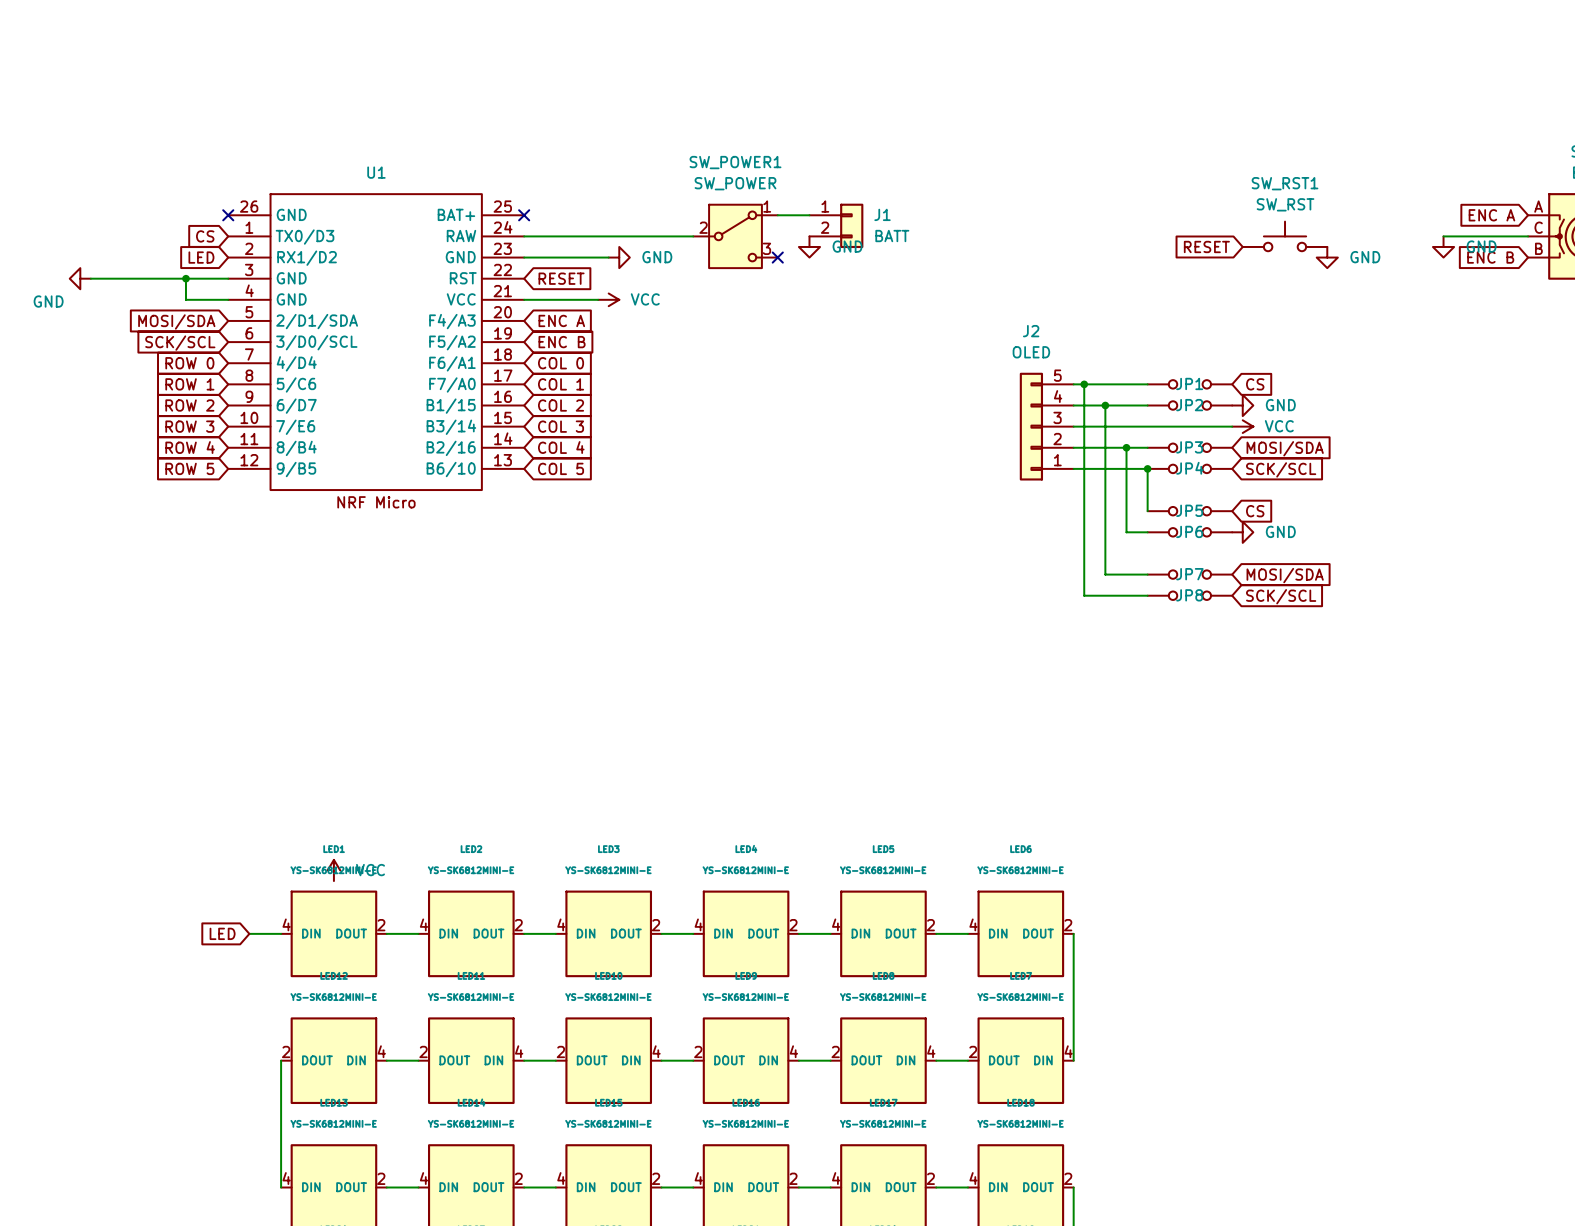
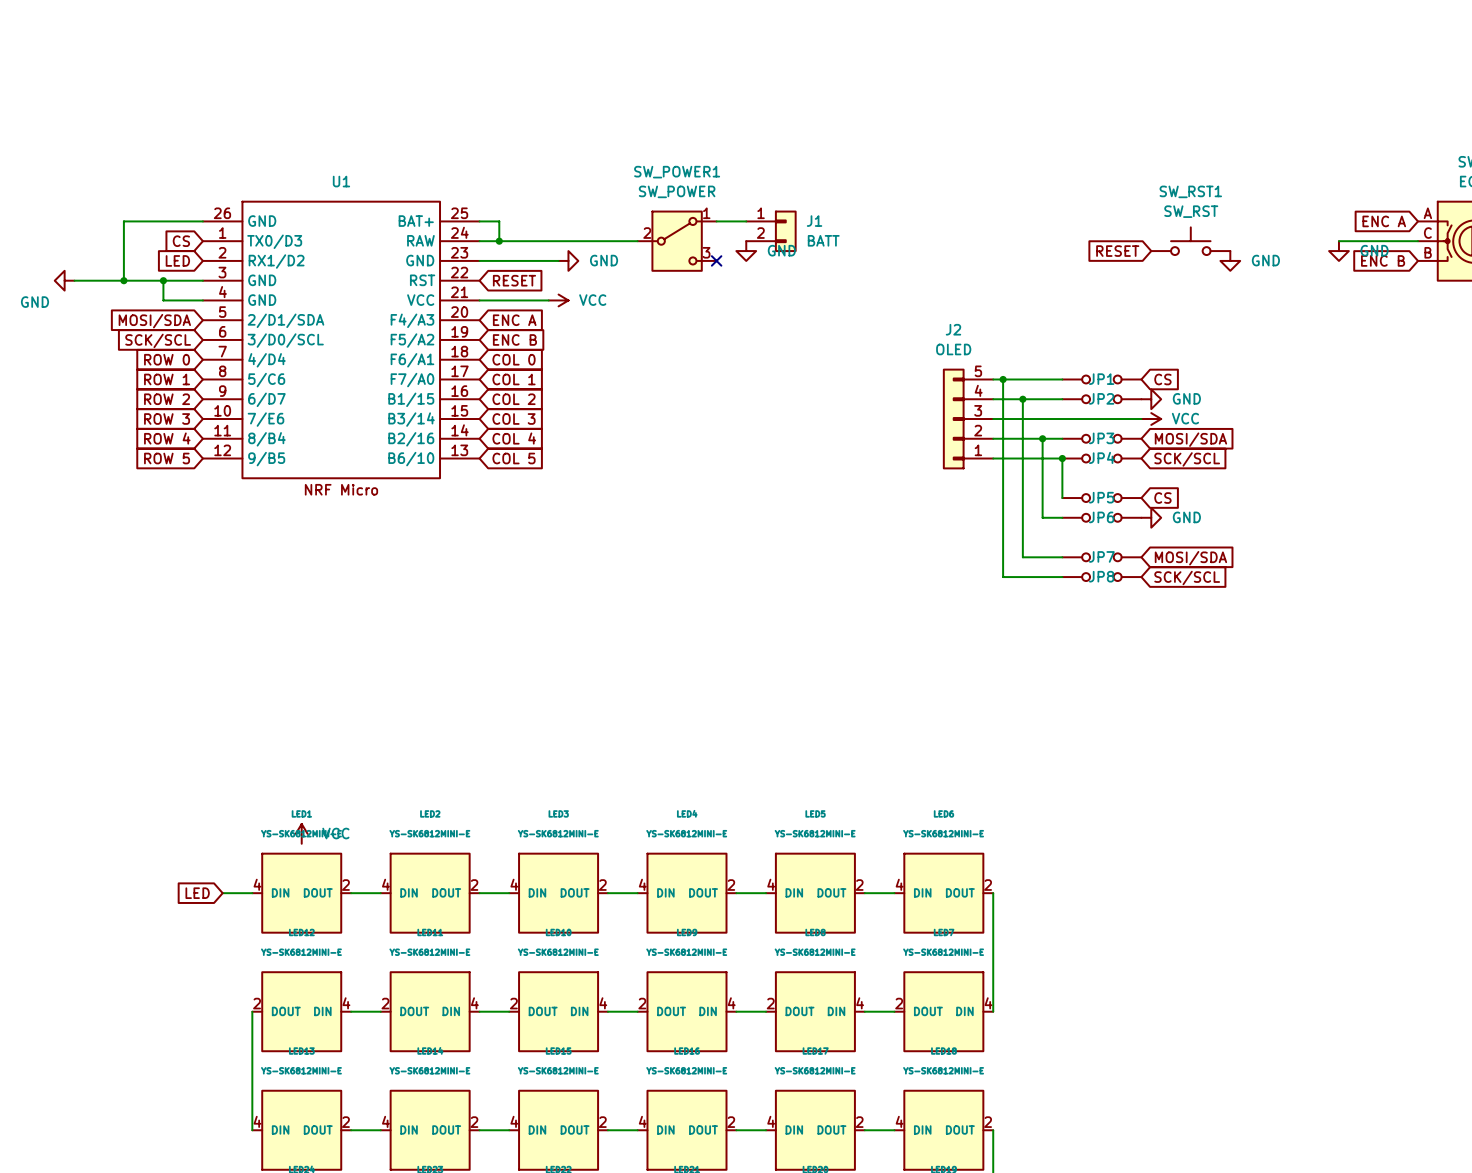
wire: none -> (202, 221) (123, 221) (123, 280)
no-connect mark: (228, 215) -> none
wire: none -> (479, 221) (499, 221) (499, 241)
no-connect mark: (524, 215) -> none
junction: none -> (499, 241)
junction: none -> (123, 280)

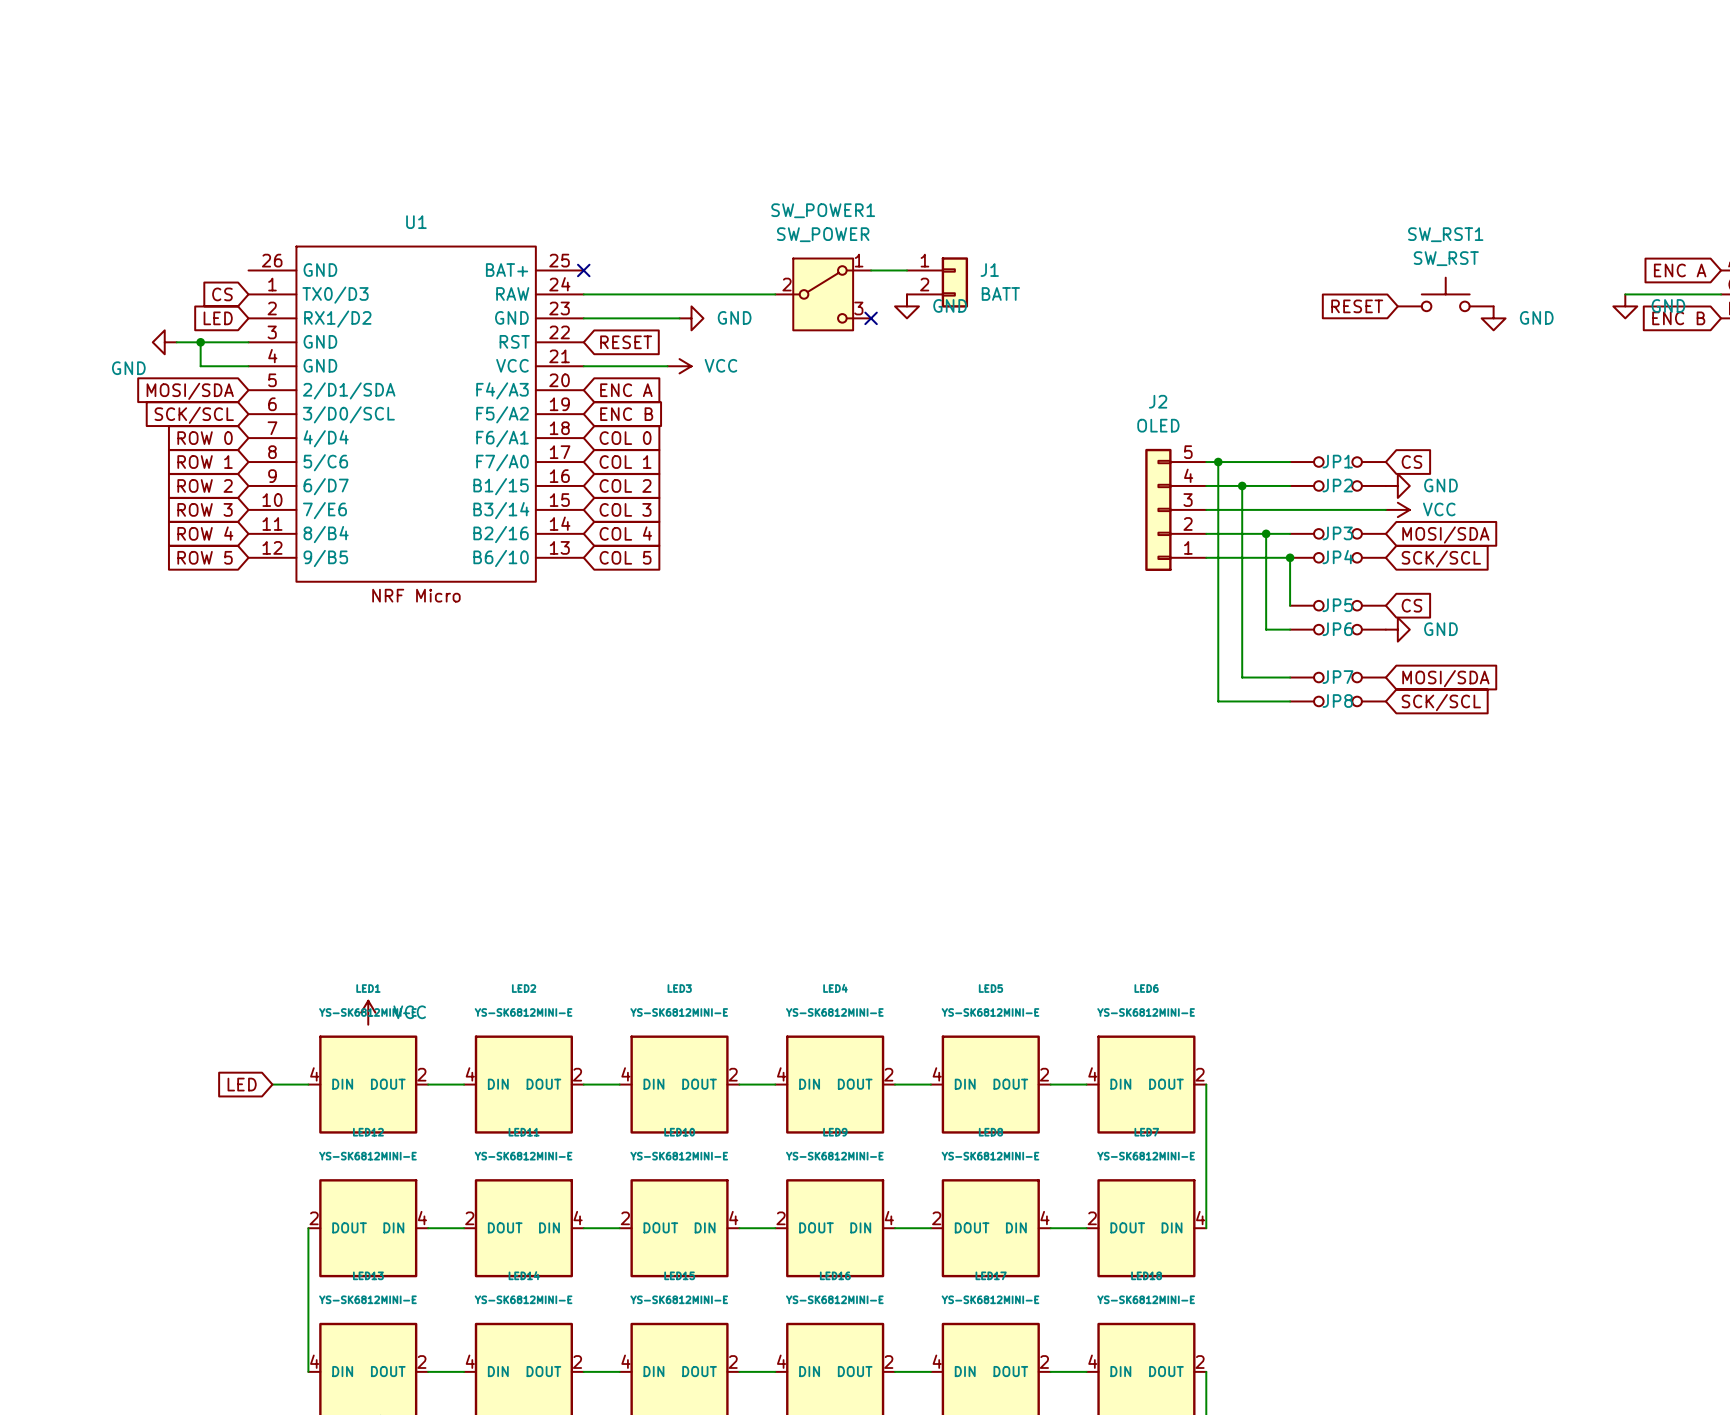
wire: (202, 221) (123, 221) (123, 280) -> none
wire: (479, 221) (499, 221) (499, 241) -> none
no-connect mark: none -> (583, 270)
junction: (499, 241) -> none
power symbol position: GND (64, 280) -> GND (164, 342)
wire: (74, 280) (143, 280) -> none
junction: (123, 280) -> none

